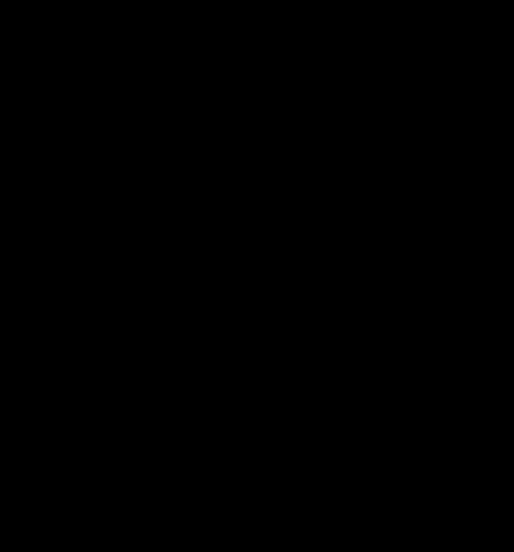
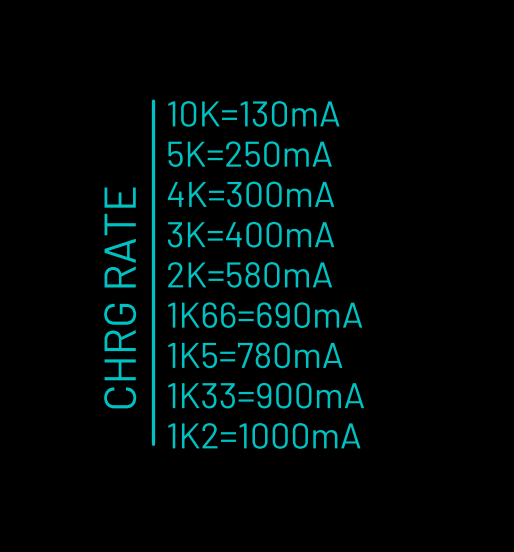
line: none -> (153, 101) (153, 444)
text: none -> 10K=130mA (253, 113)
text: none -> 5K=250mA (250, 154)
text: none -> 4K=300mA (251, 194)
text: none -> 3K=400mA (251, 234)
text: none -> 2K=580mA (250, 274)
text: none -> CHRG RATE (120, 297)
text: none -> 1K66=690mA (265, 315)
text: none -> 1K5=780mA (255, 355)
text: none -> 1K33=900mA (266, 395)
text: none -> 1K2=1000mA (264, 435)

